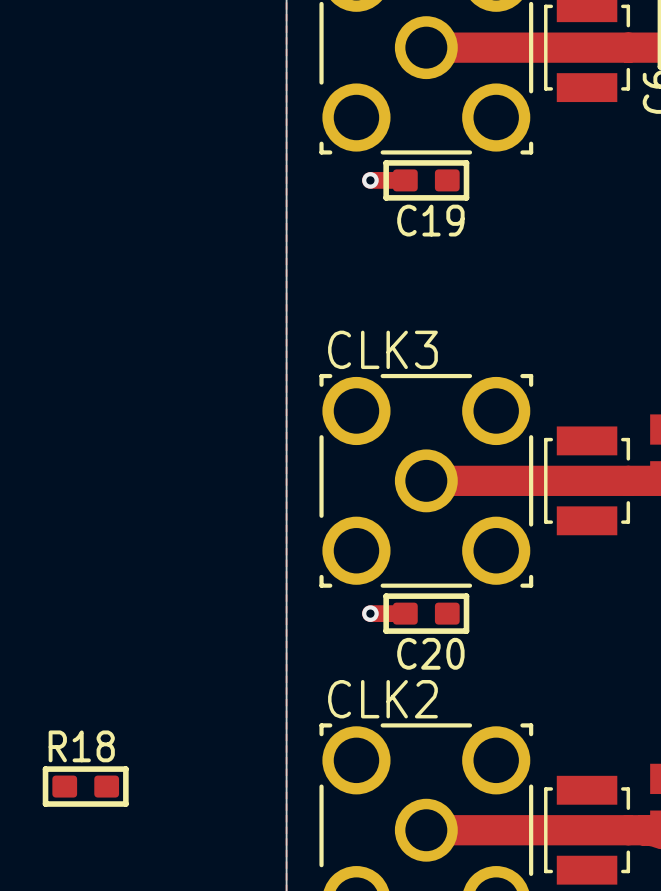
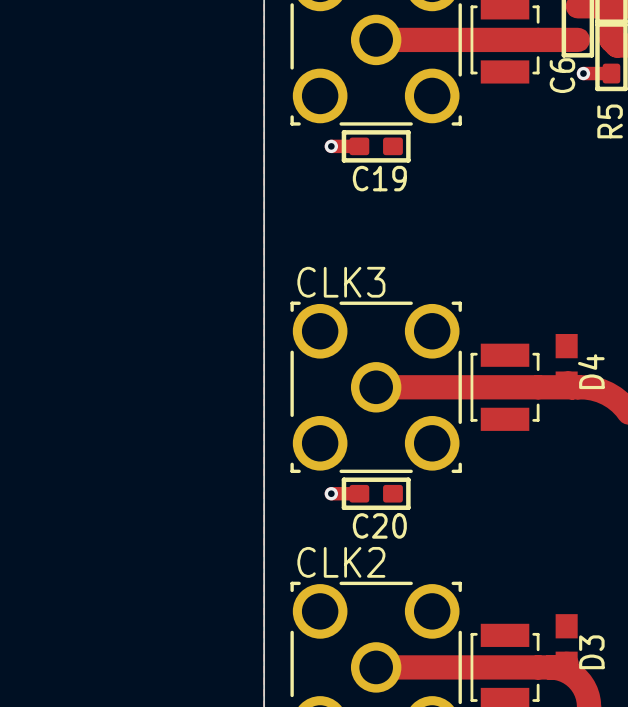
R18: (85, 786) -> none

